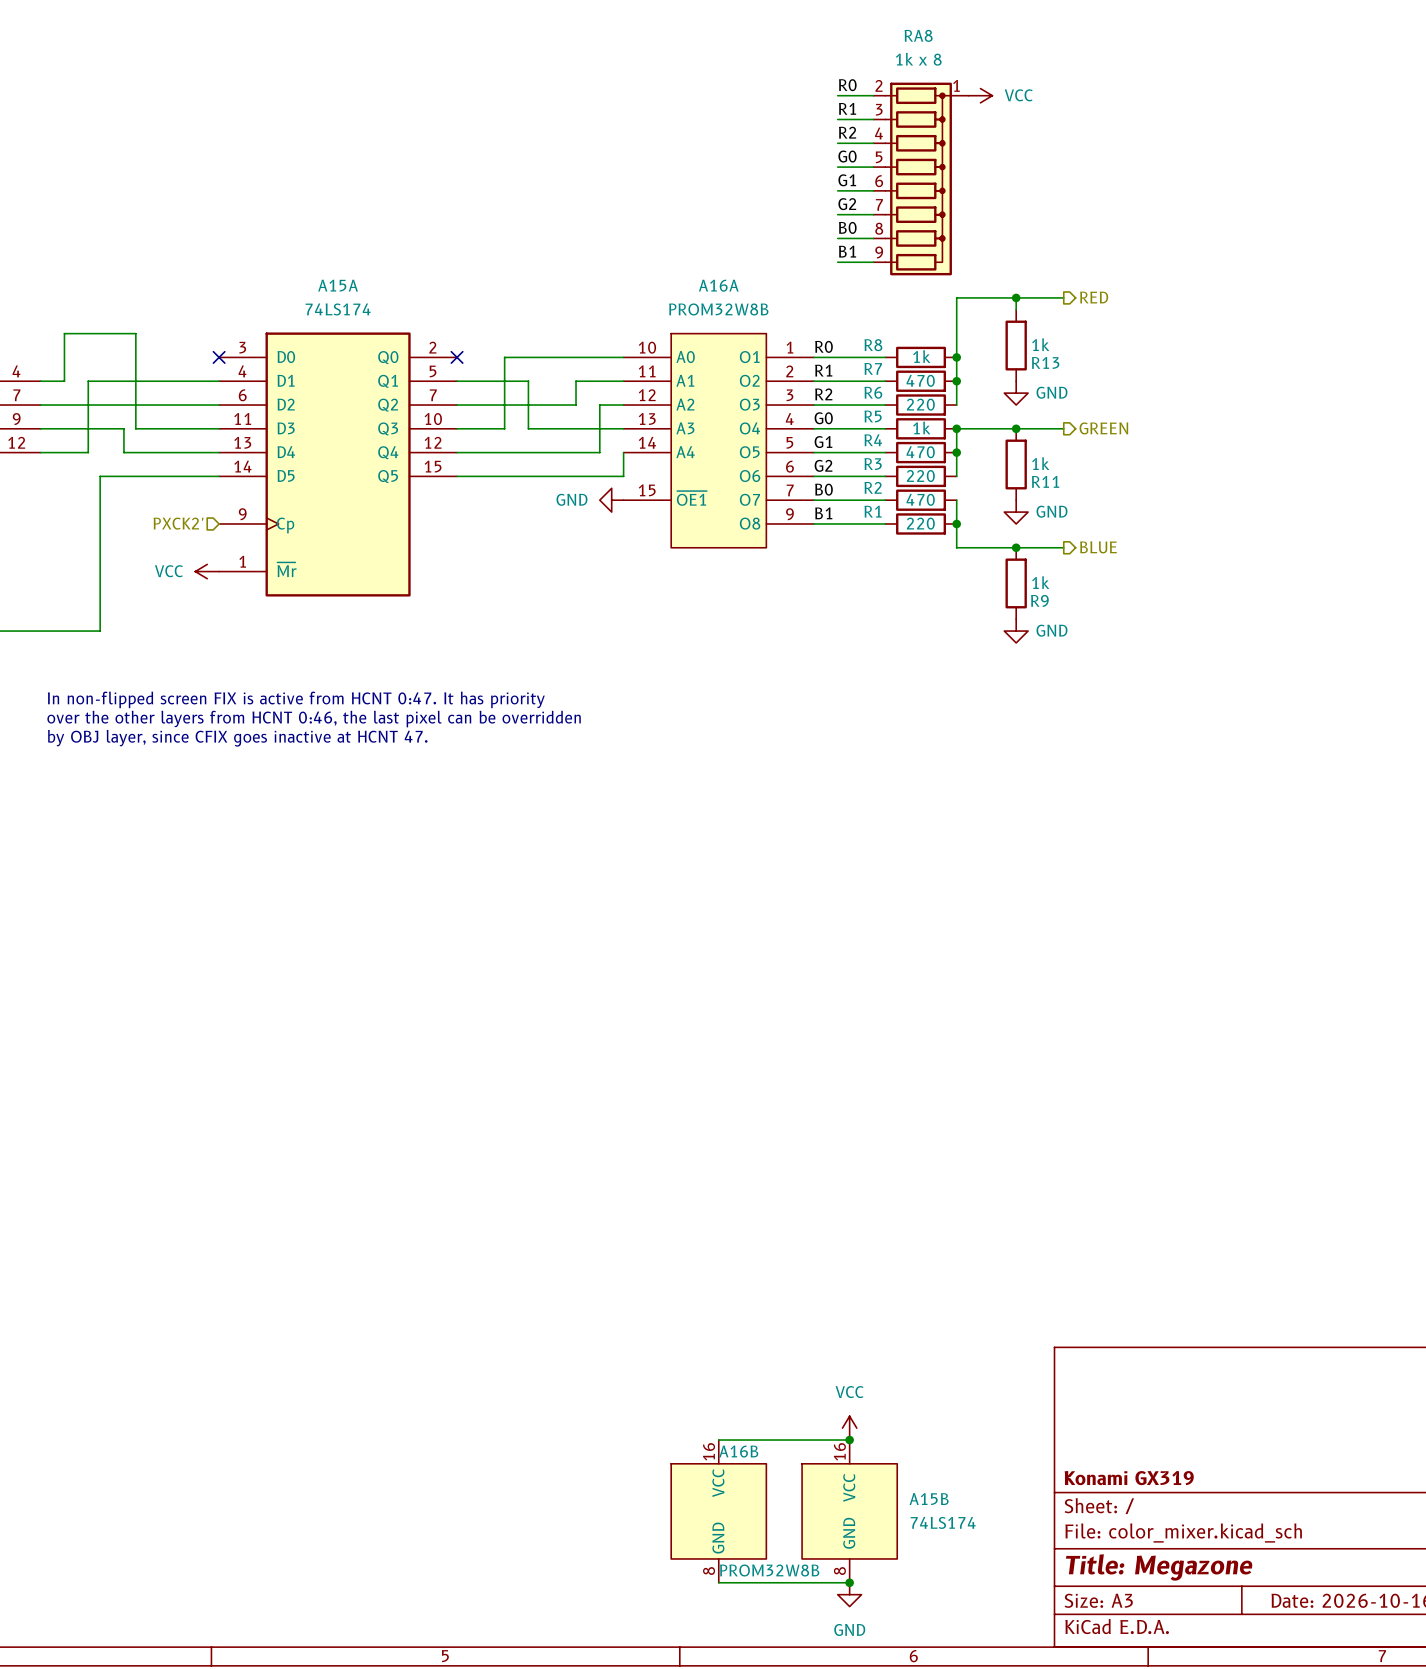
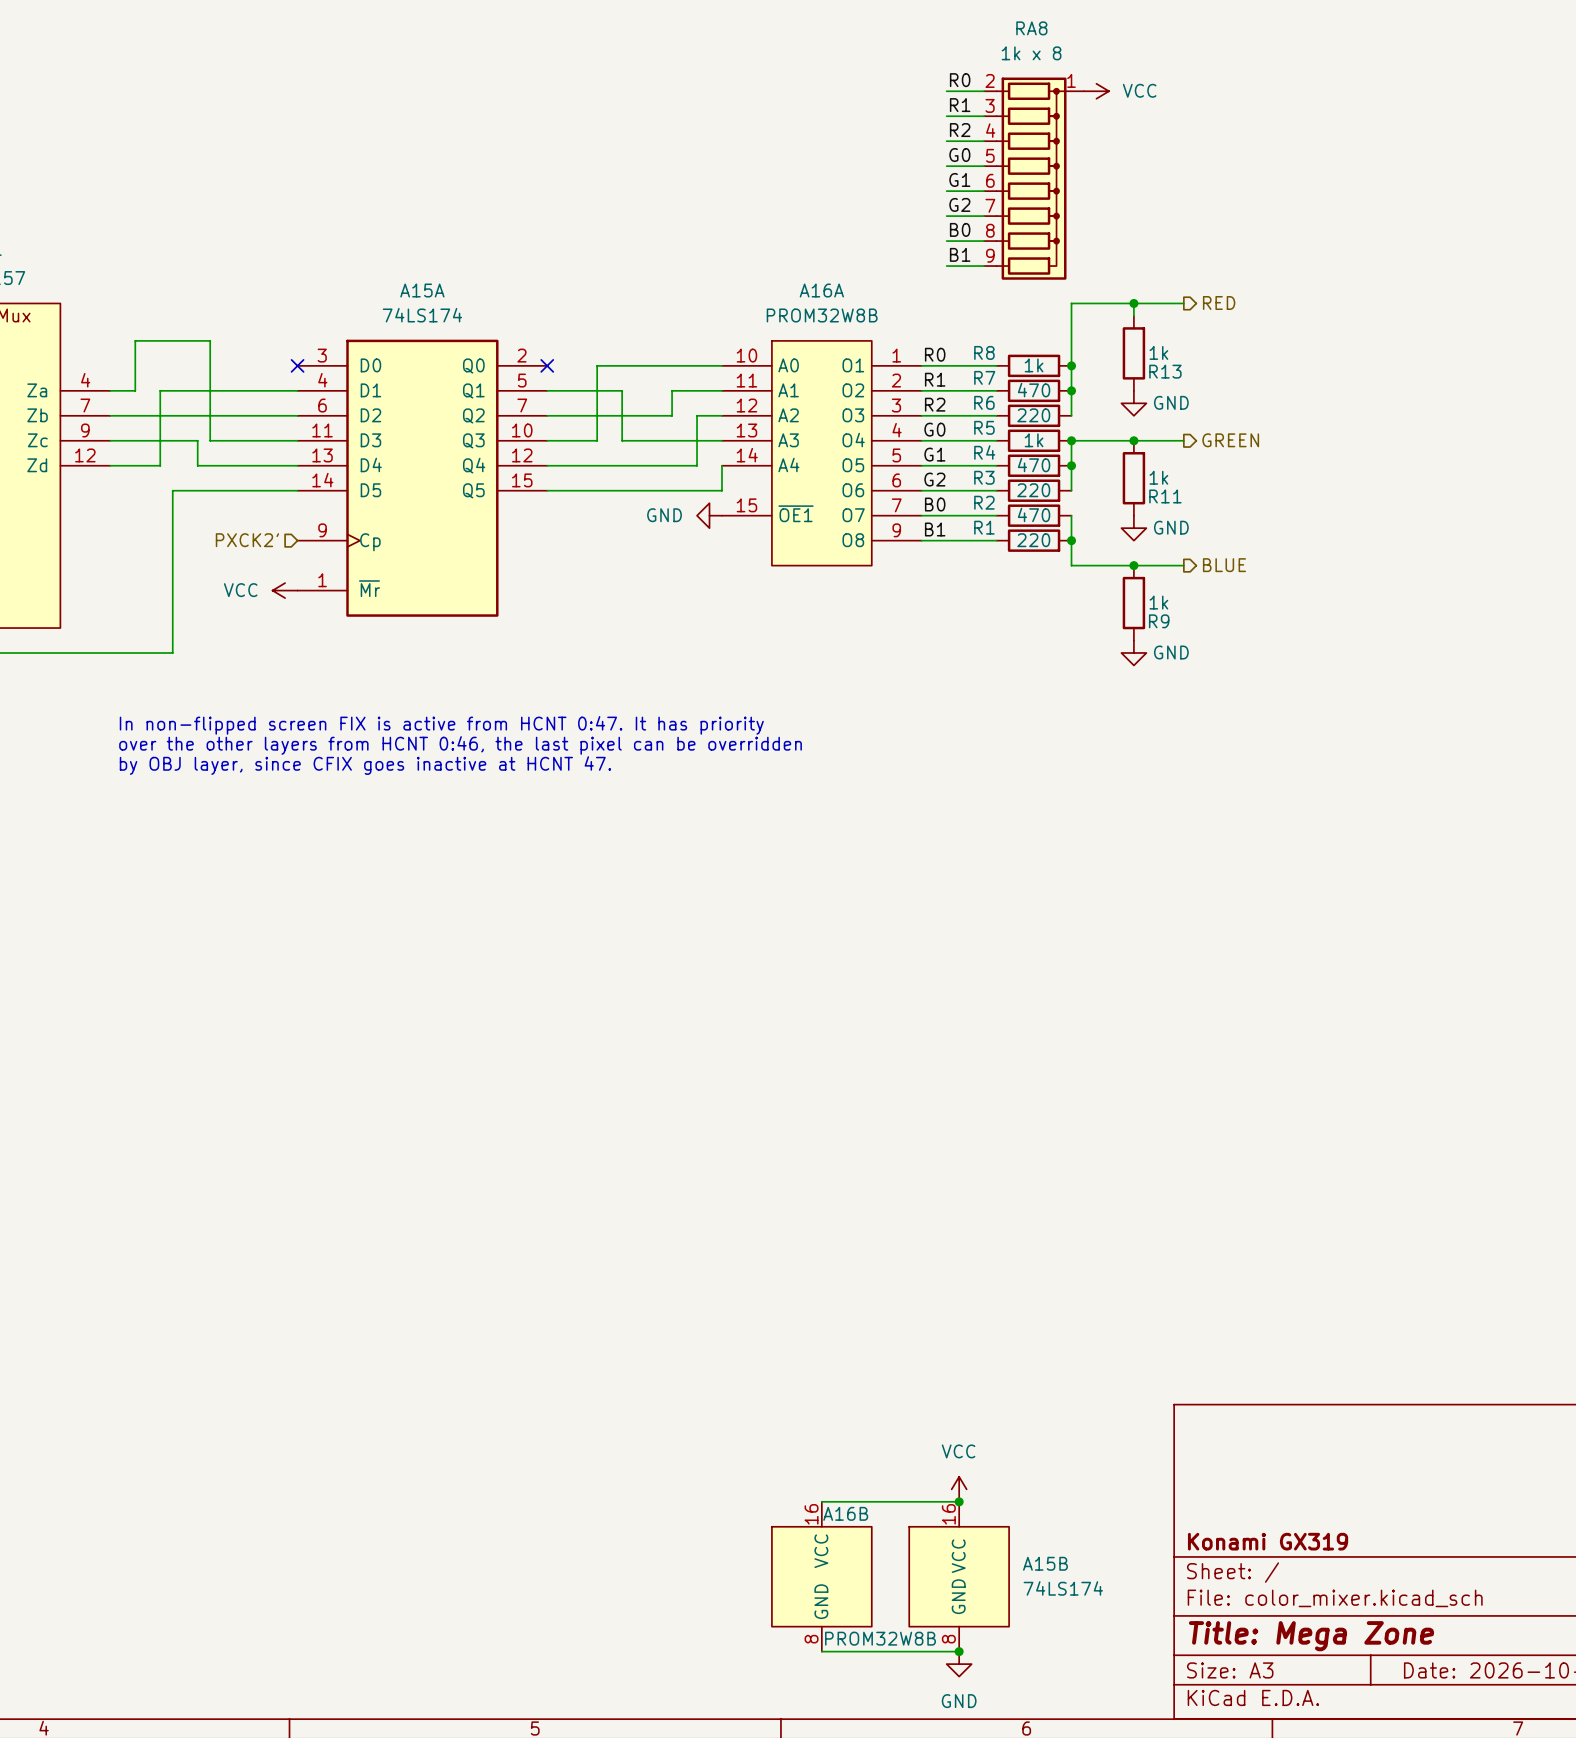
title block: Title: Megazone (1159, 1567) -> Title: Mega Zone (1311, 1636)

